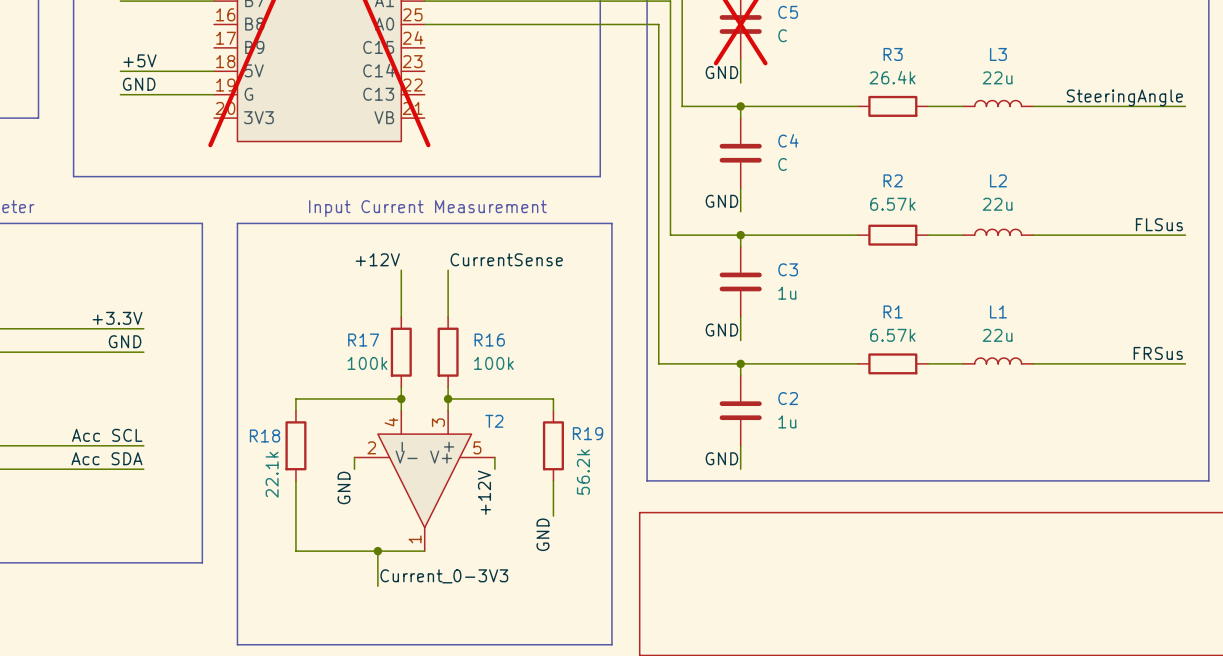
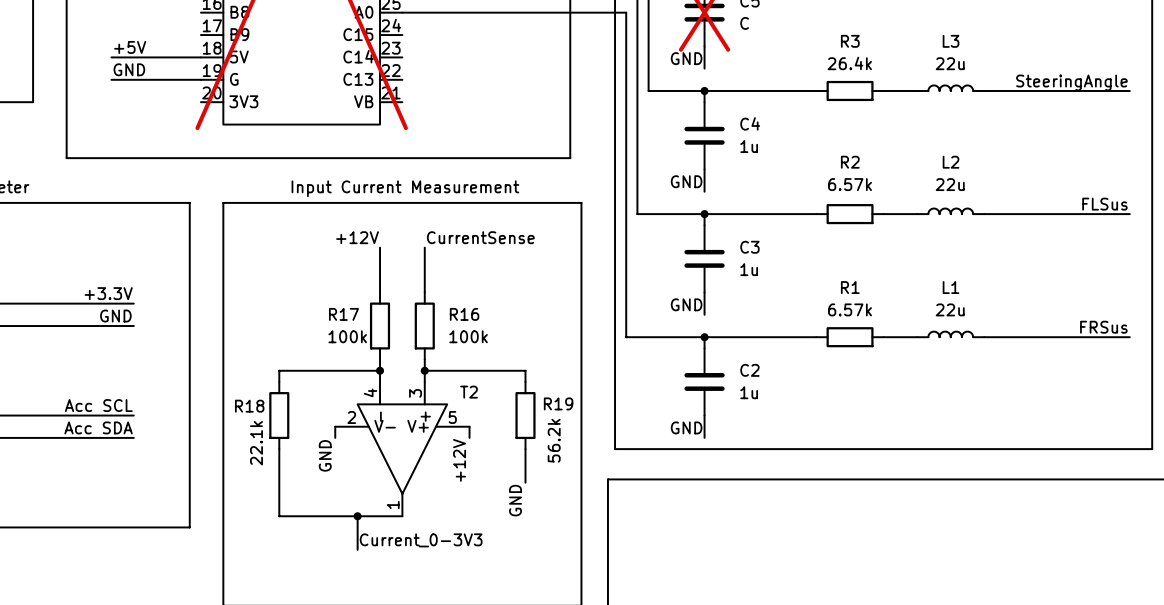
C4 value: C (782, 164) -> 1u (749, 146)

